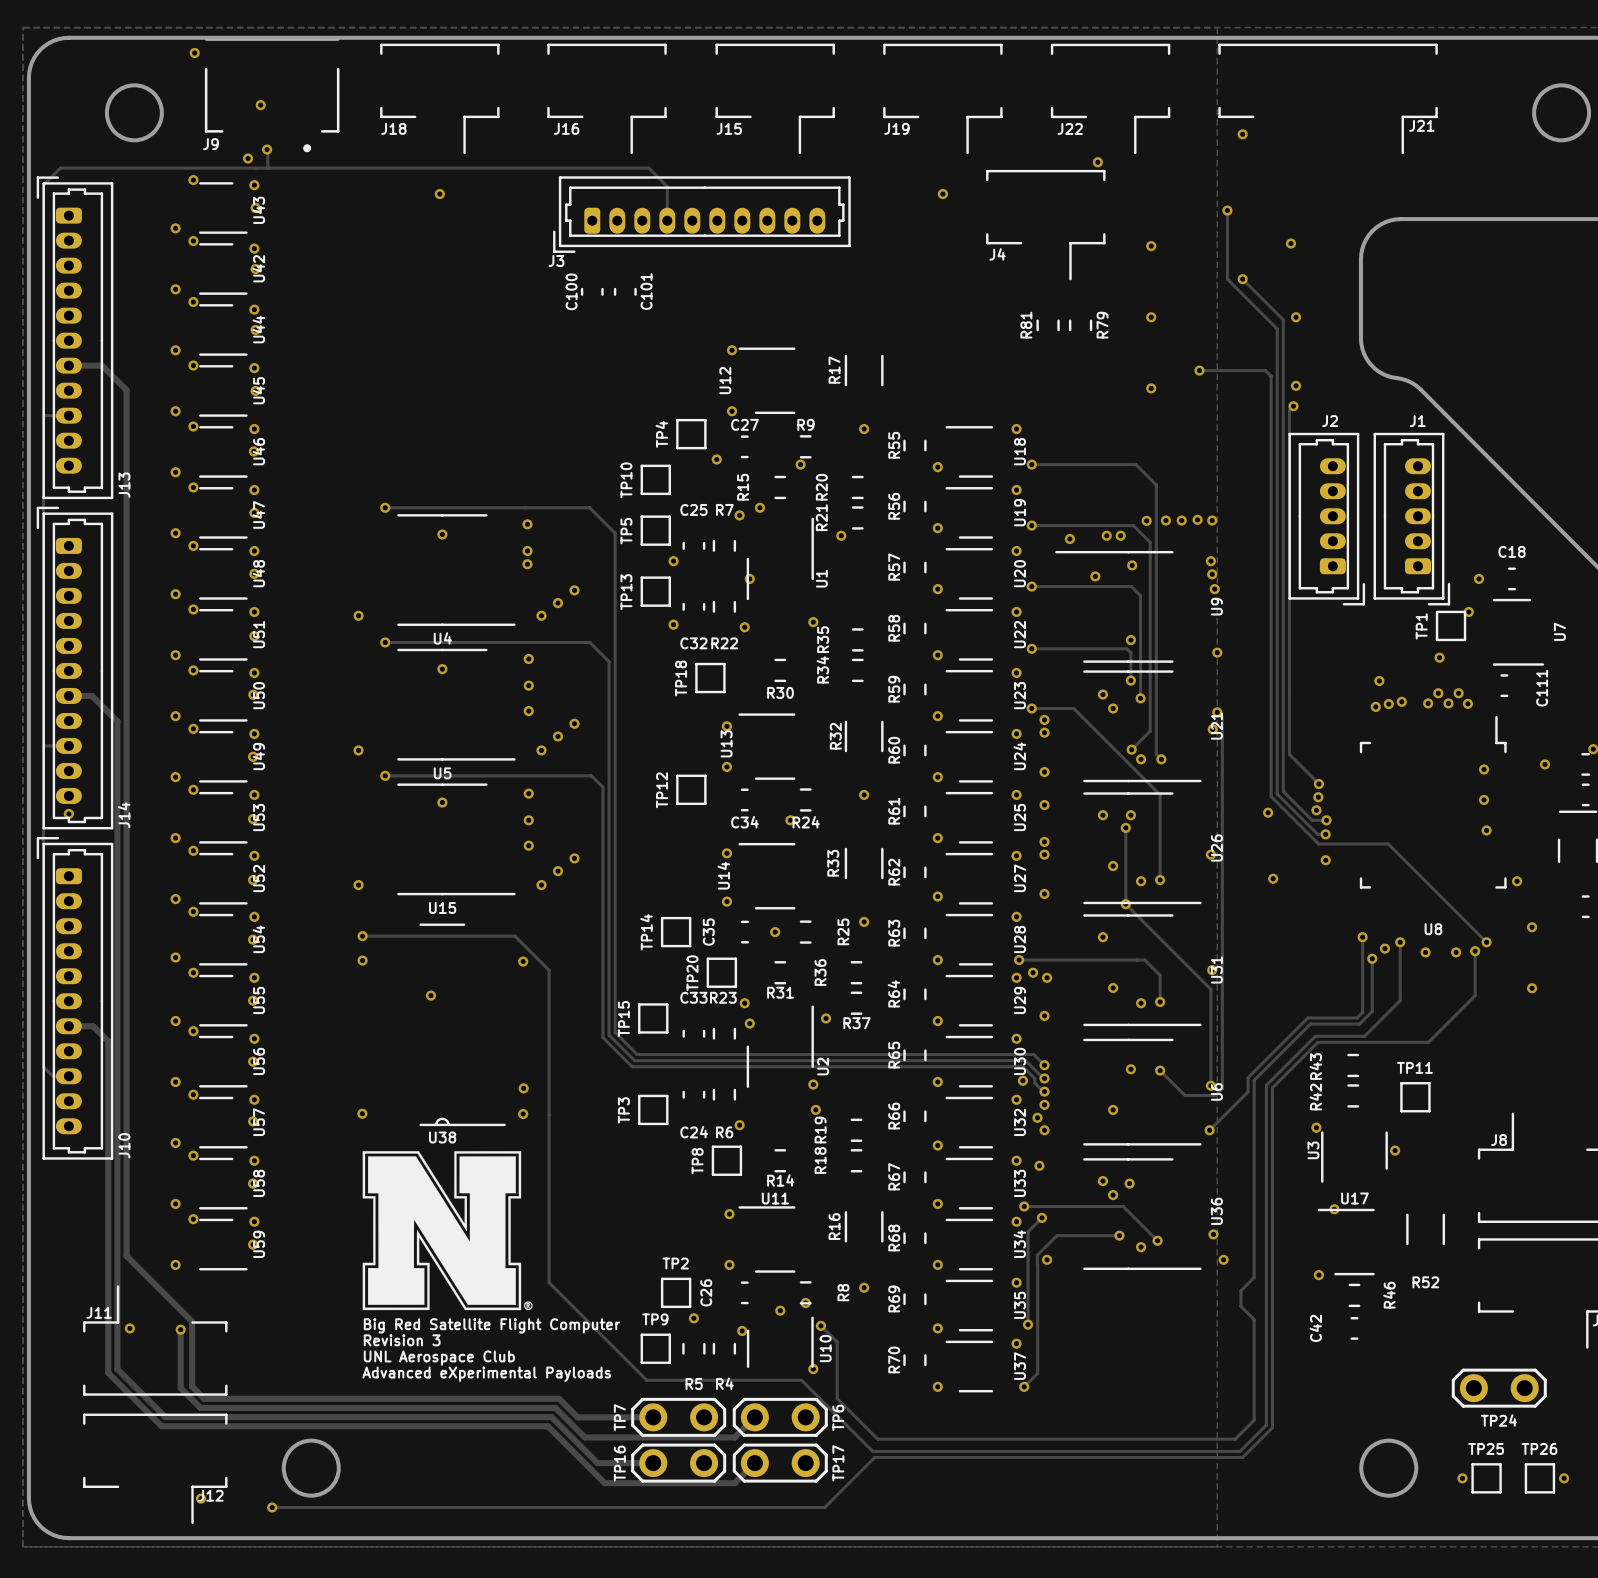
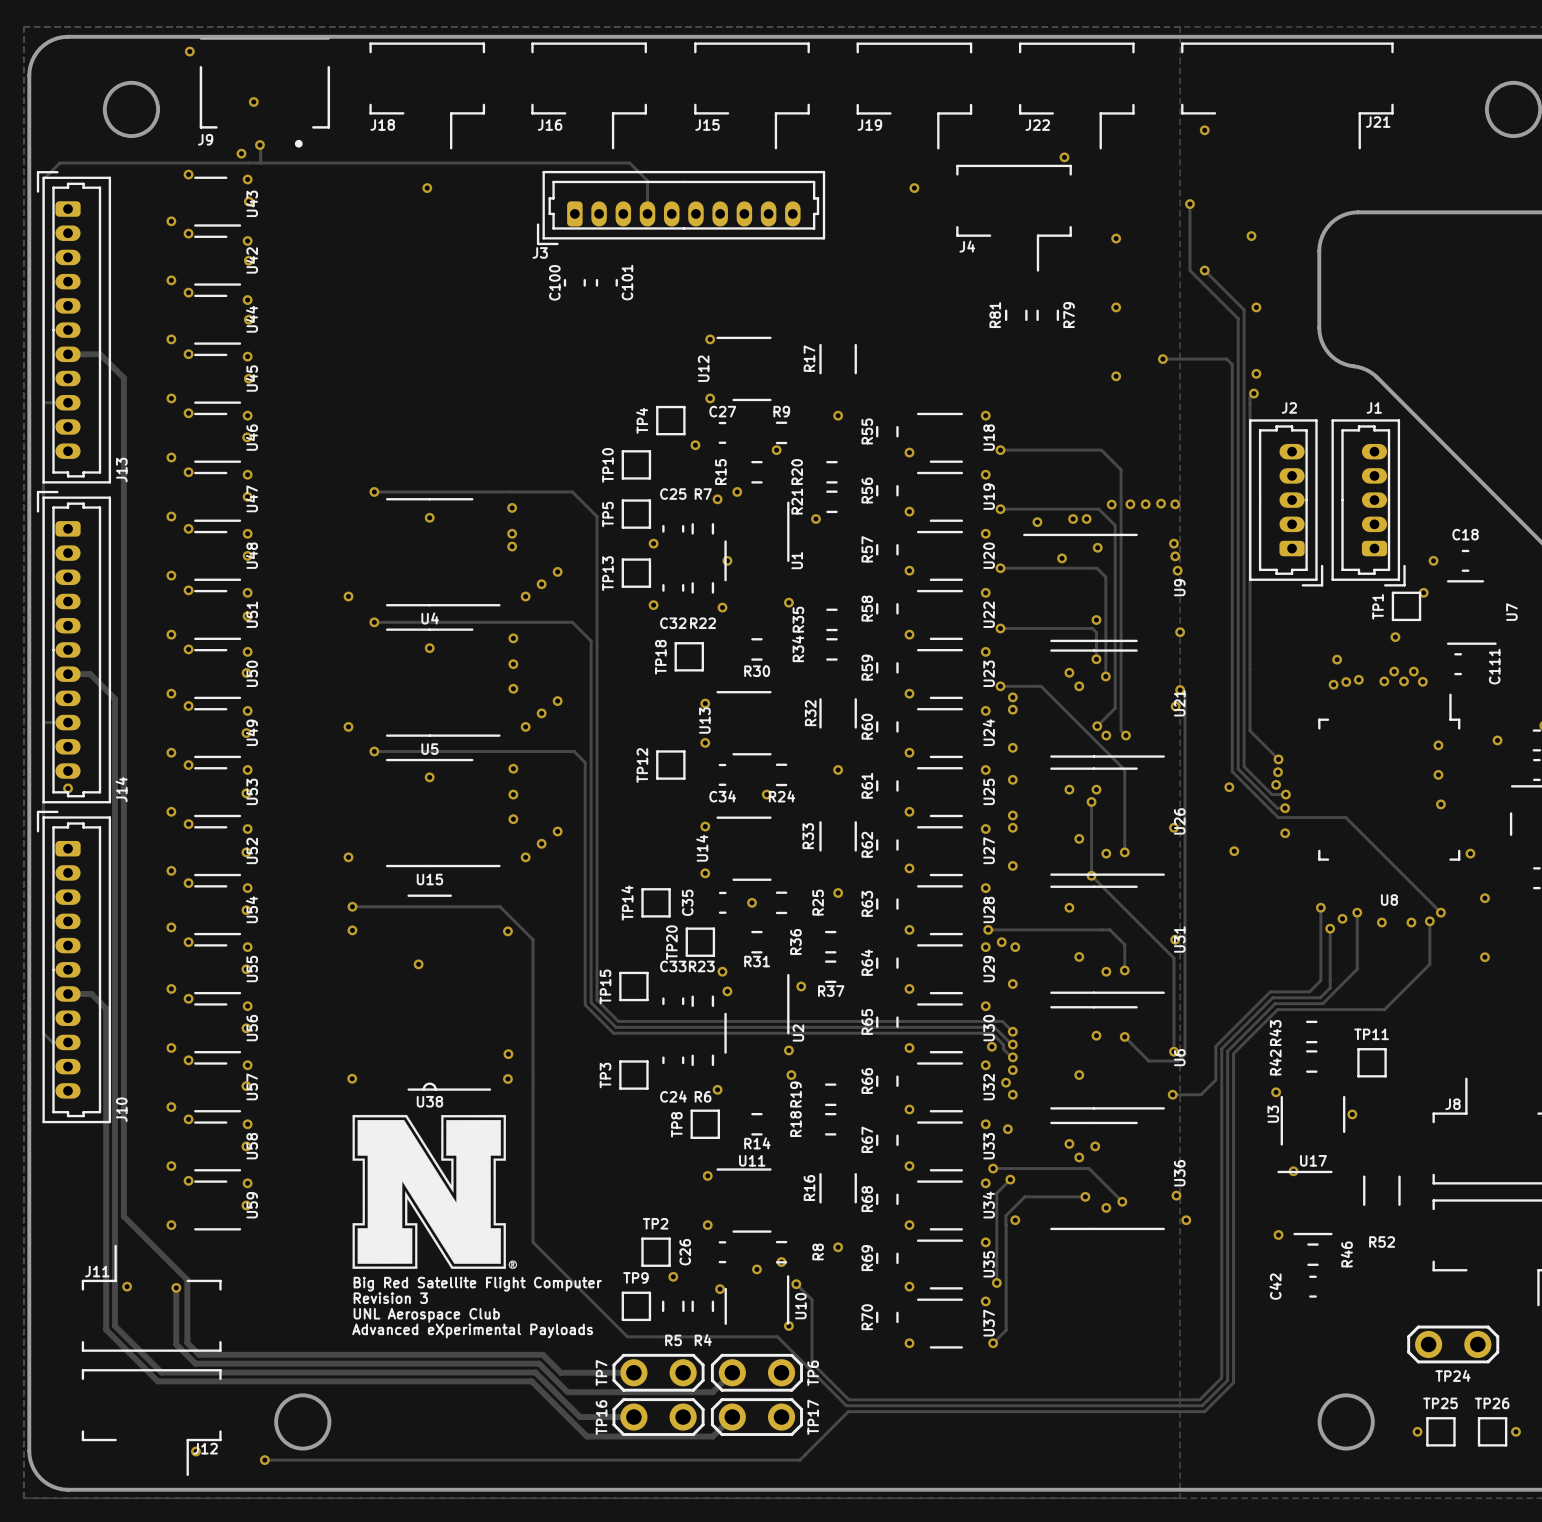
track: (1372, 1011) (1359, 1024) (1350, 1024) -> (1315, 985) (1309, 991)
track: (1357, 1017) (1307, 1017) (1248, 1077) (1248, 1091) (1209, 1130) -> (1215, 1079) (1201, 1094) (1172, 1094)
track: (1254, 1115) (1254, 1277) (1240, 1290) (1240, 1306) (1254, 1319) (1254, 1420) (1235, 1439) (877, 1439) (837, 1398) -> (1330, 979) (1330, 987) (1320, 997) (1272, 997) (1221, 1048) (1221, 1377) (1199, 1399) (848, 1399) (812, 1362) (812, 1354)

